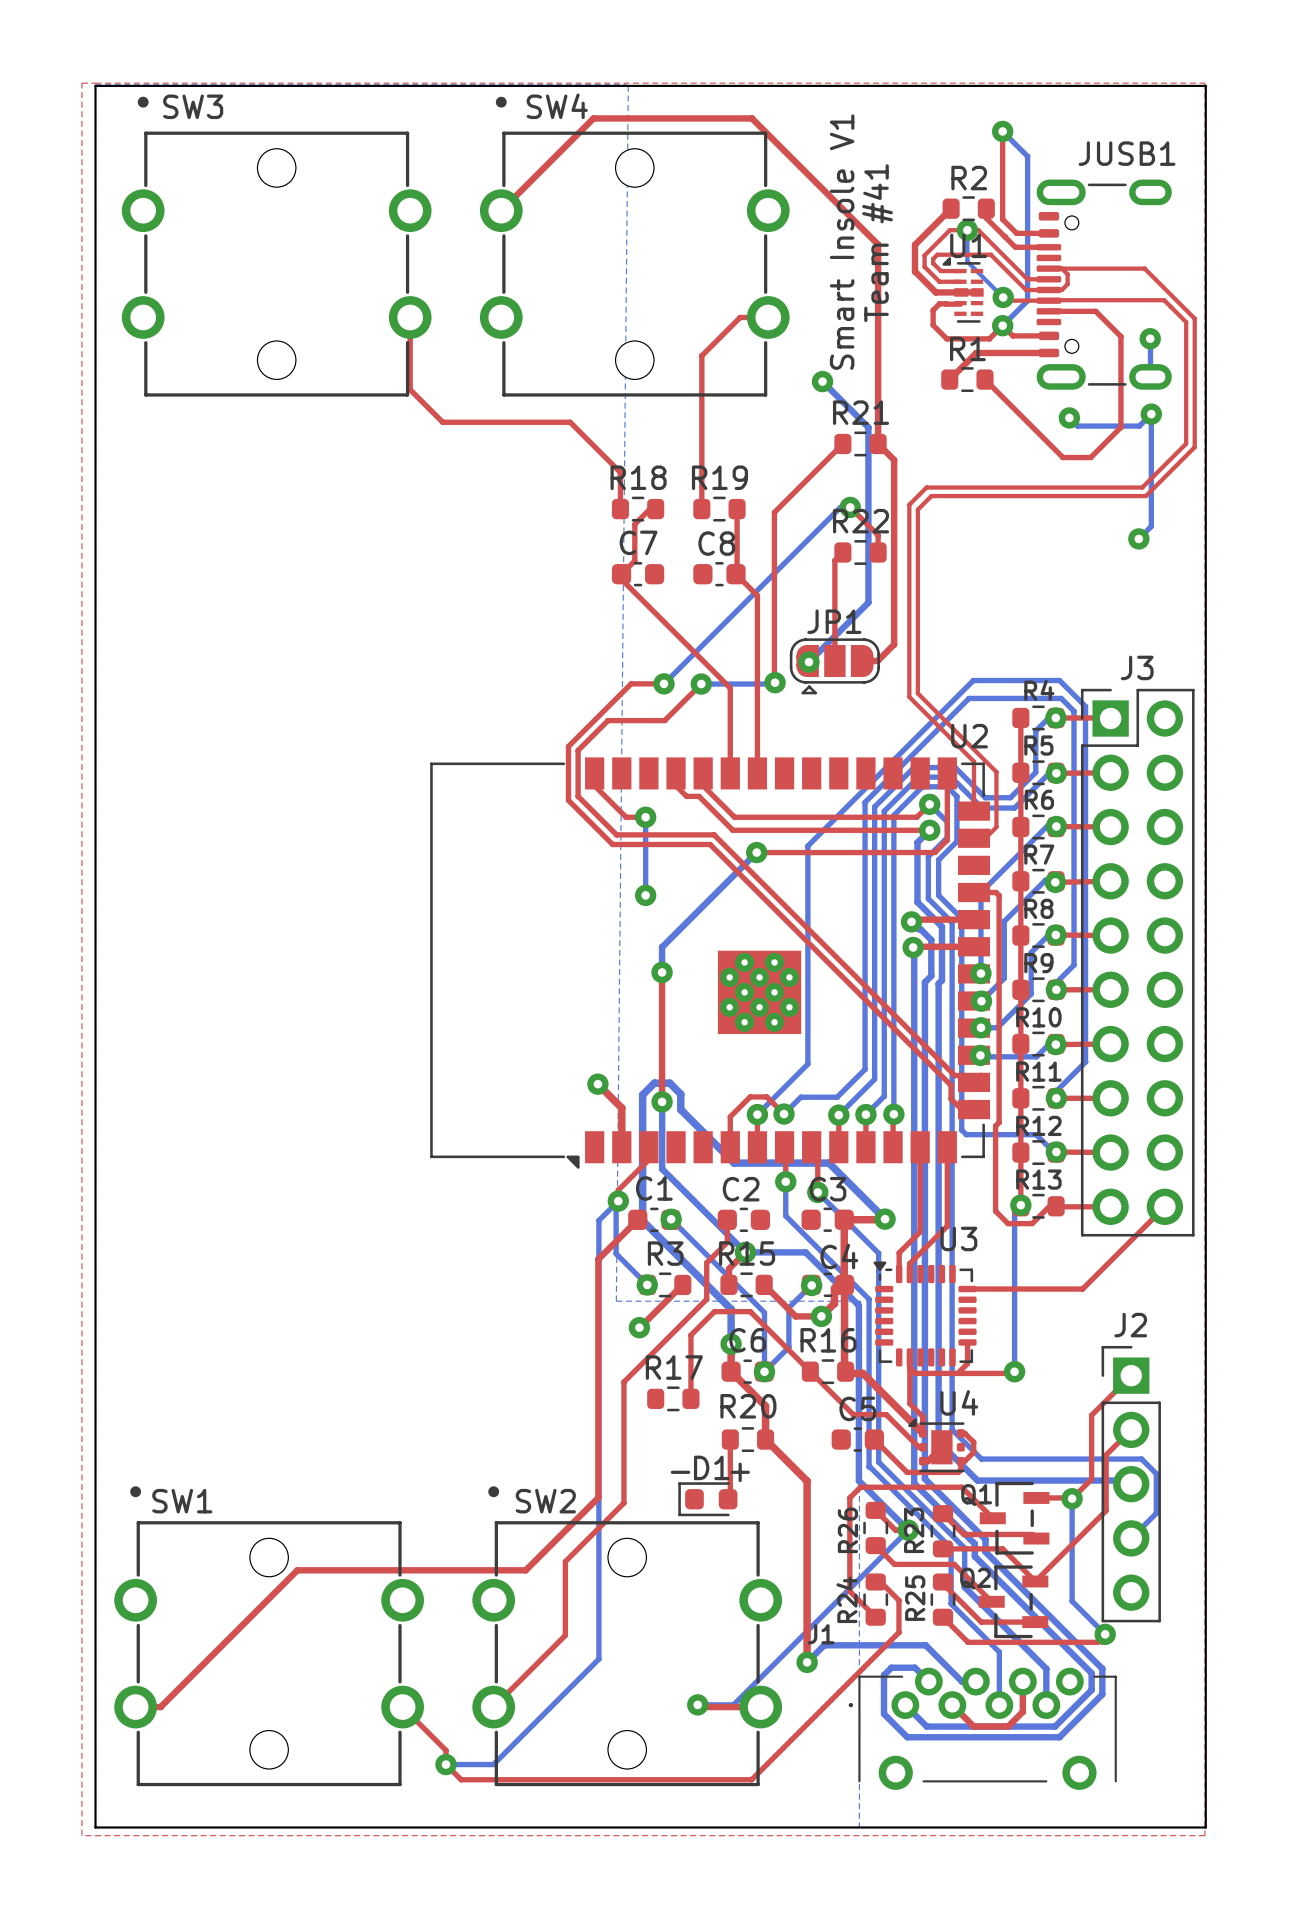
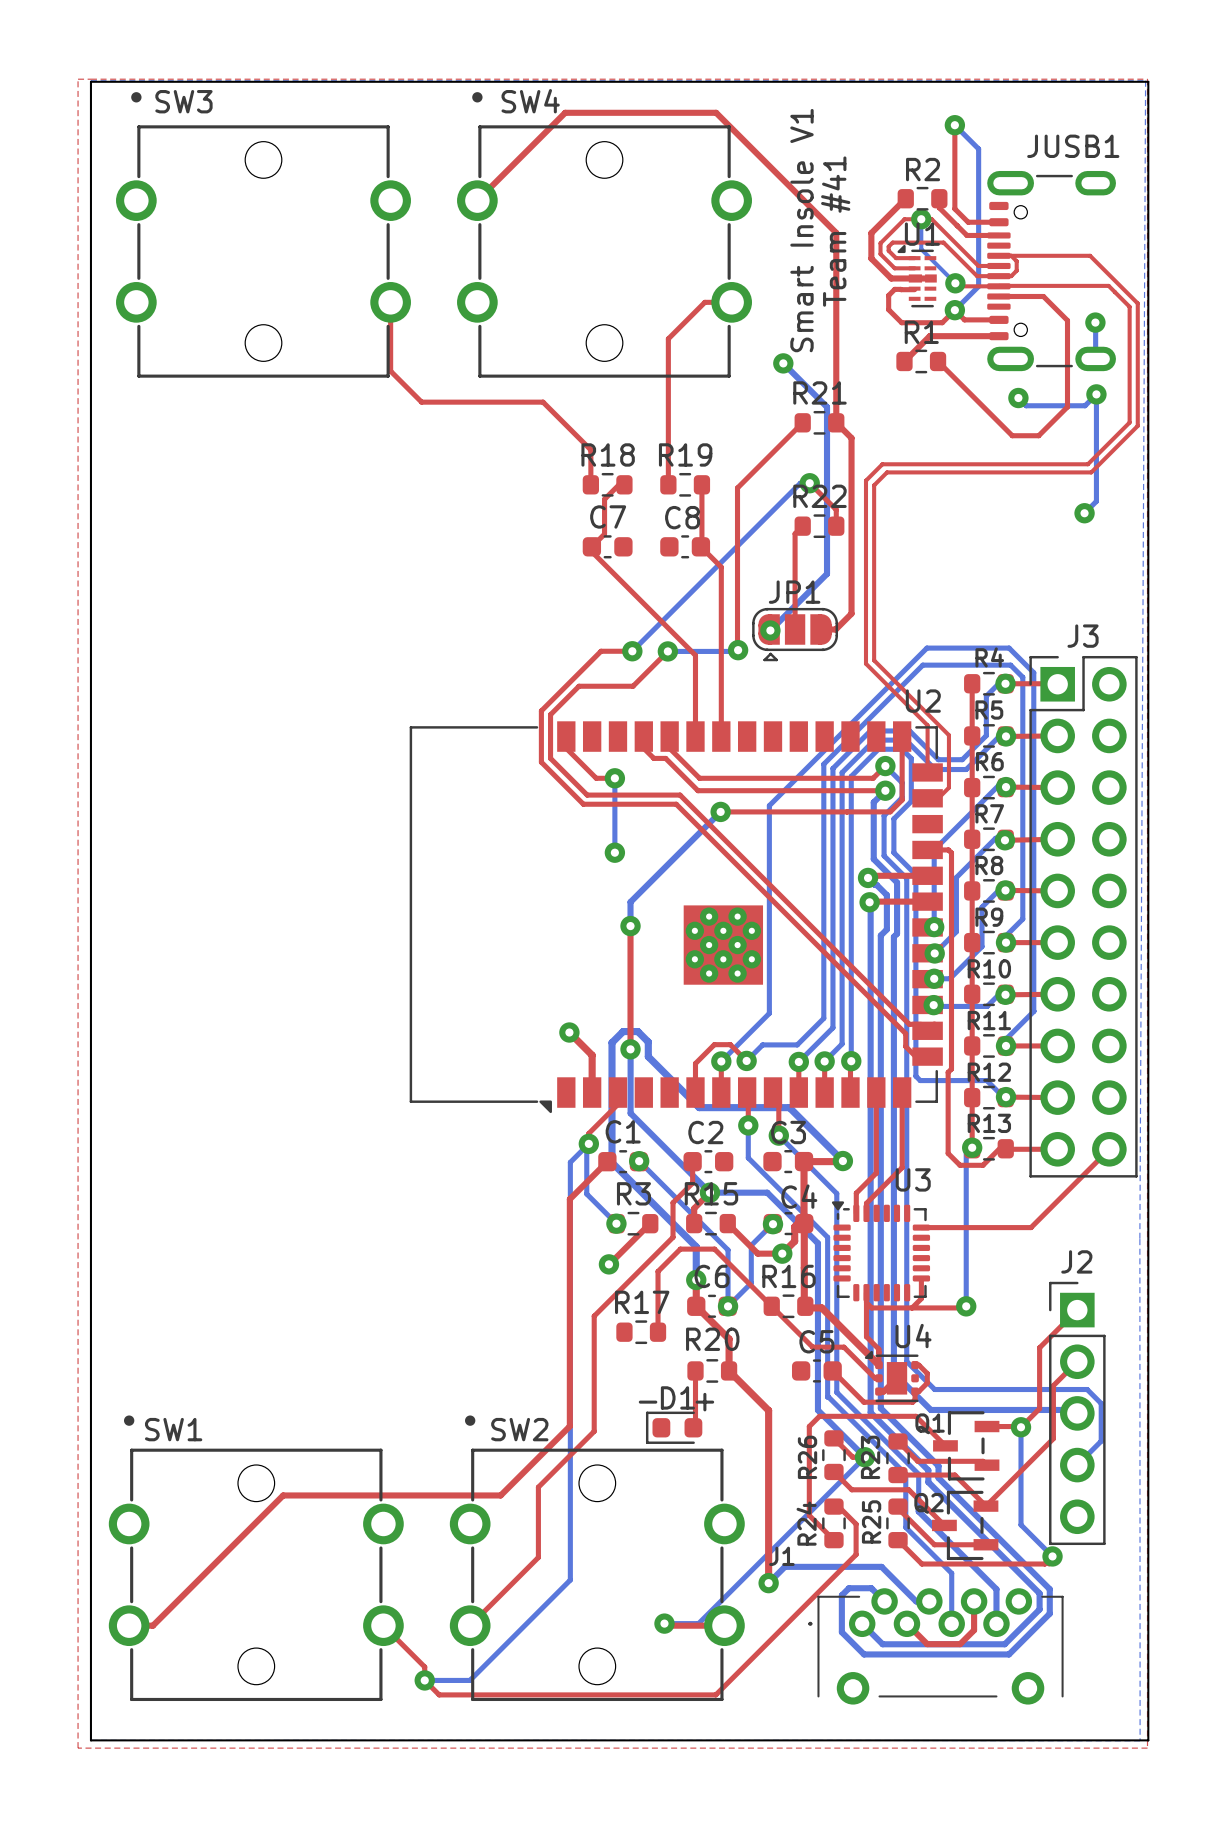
bottom zone outline: (626, 84) (628, 85) (616, 1301) (860, 1301) (858, 1827) -> (596, 80) (1145, 80) (1139, 1239) (1140, 1740) (817, 1740)

